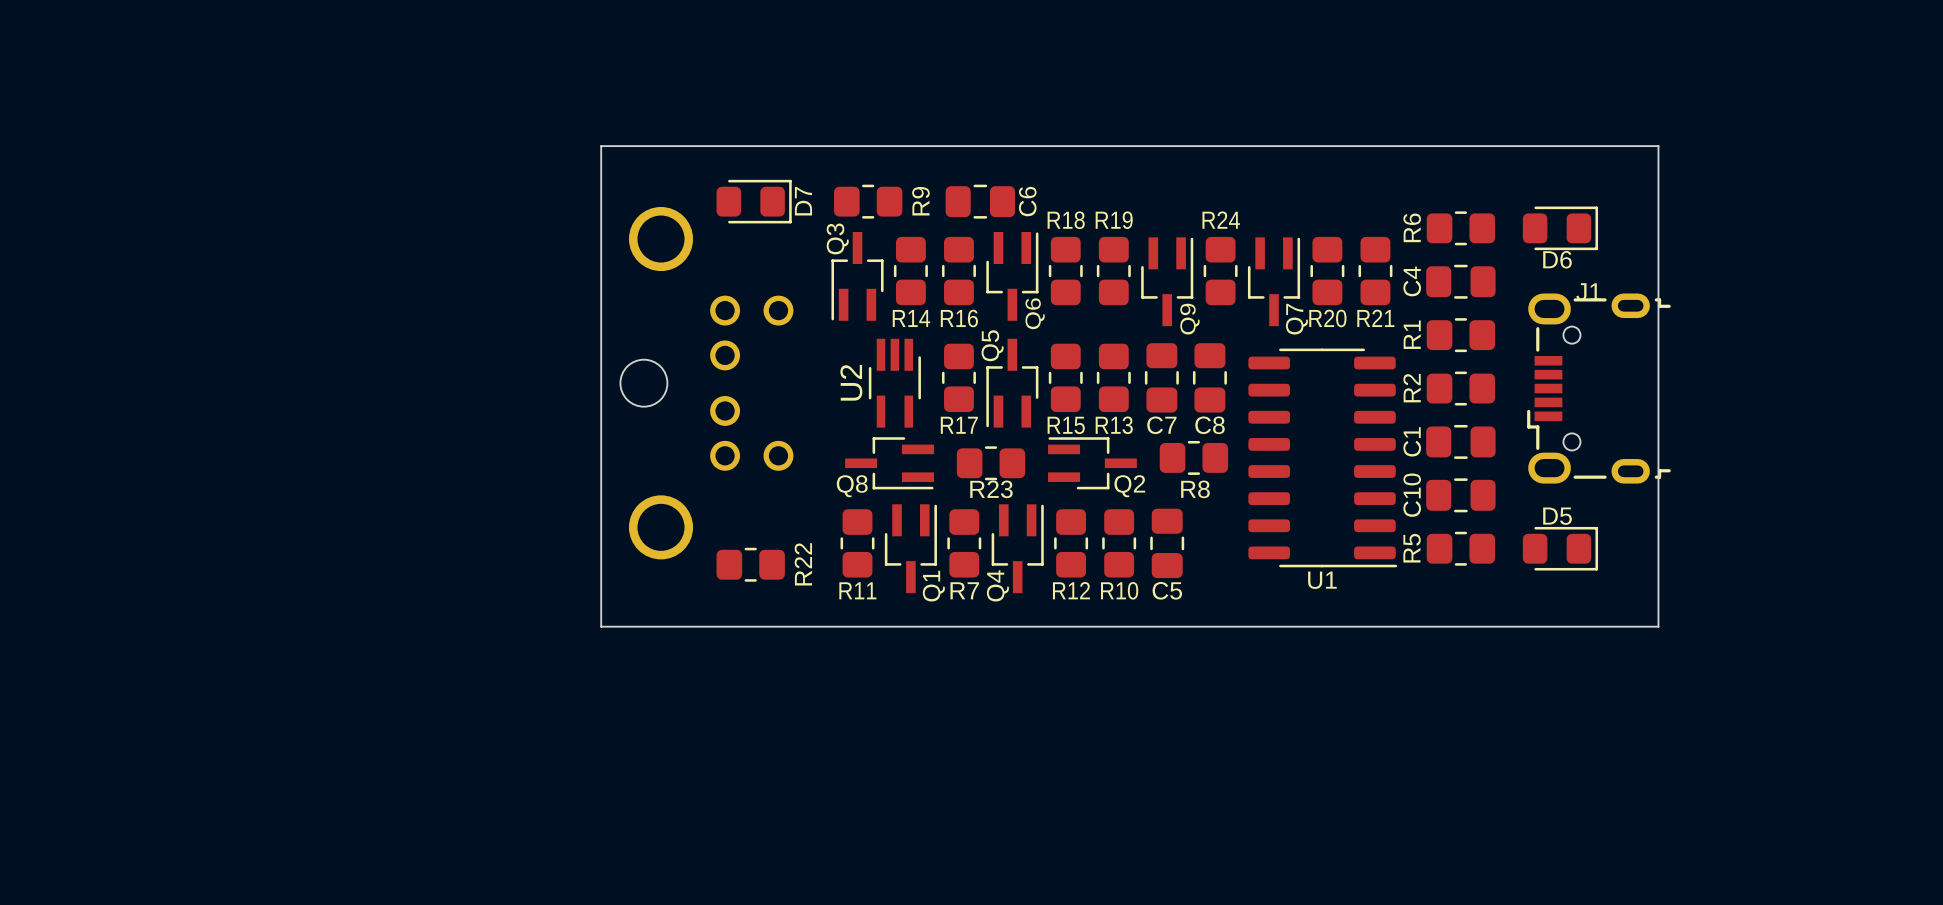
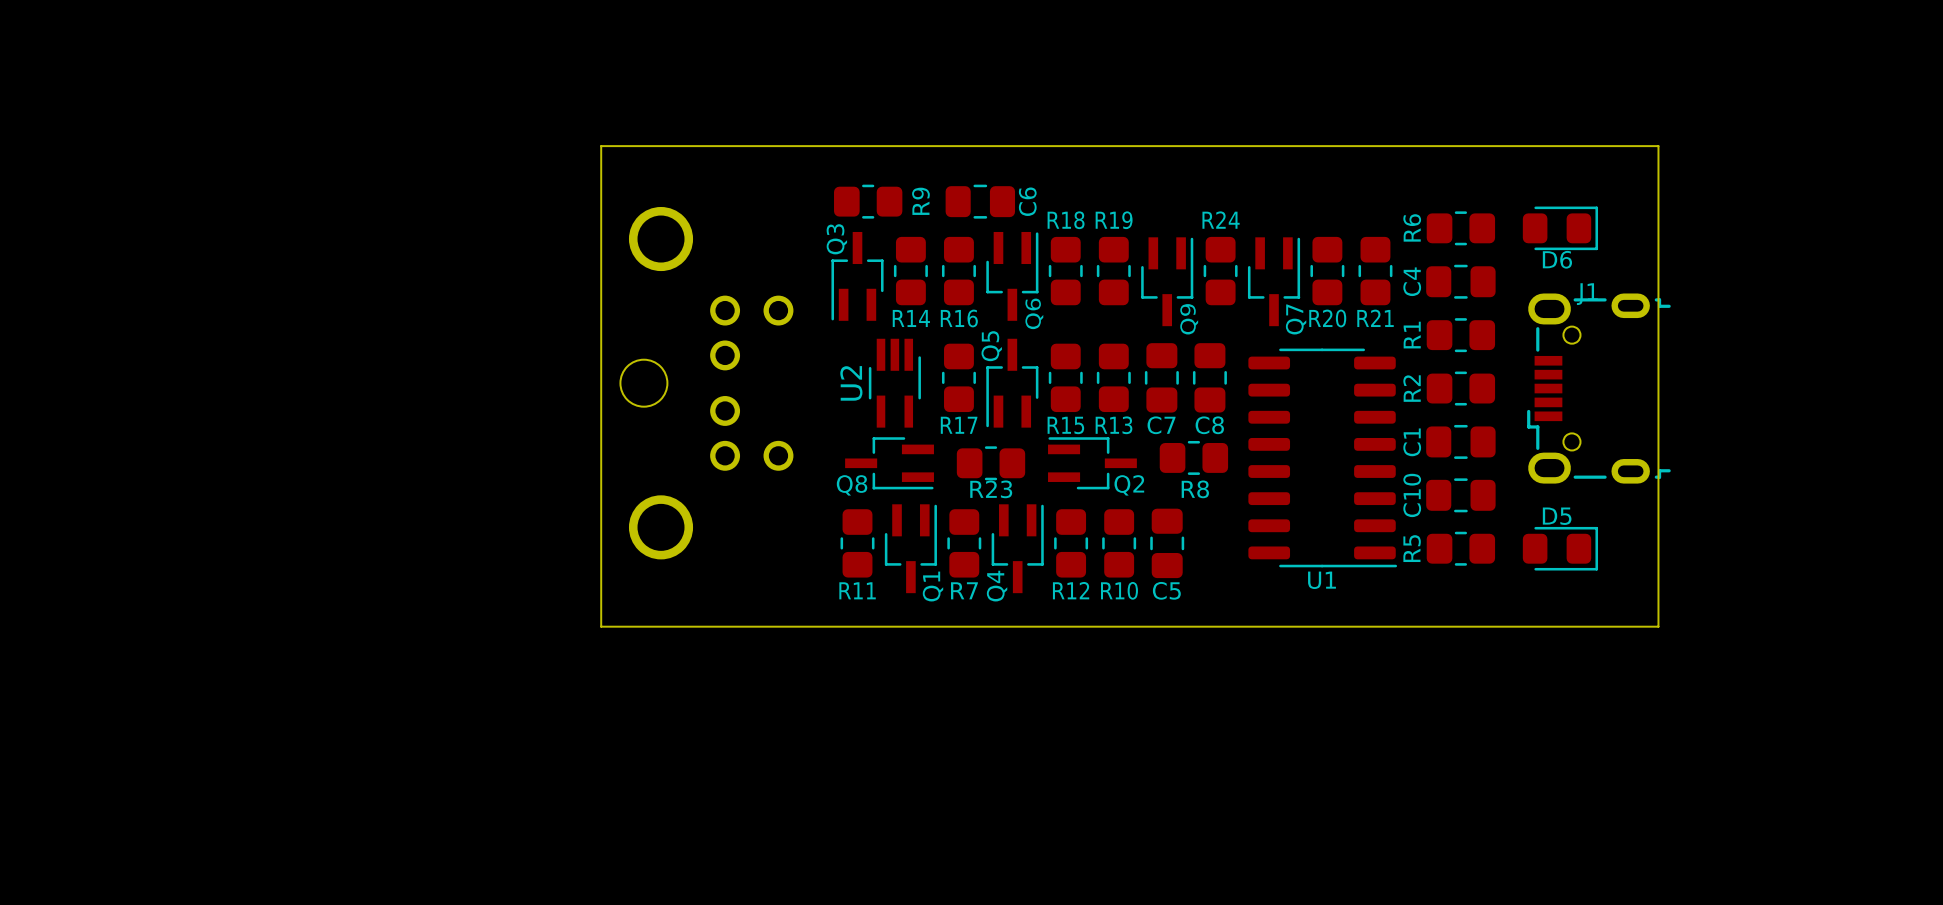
D7: (754, 201) -> none
R22: (750, 564) -> none

